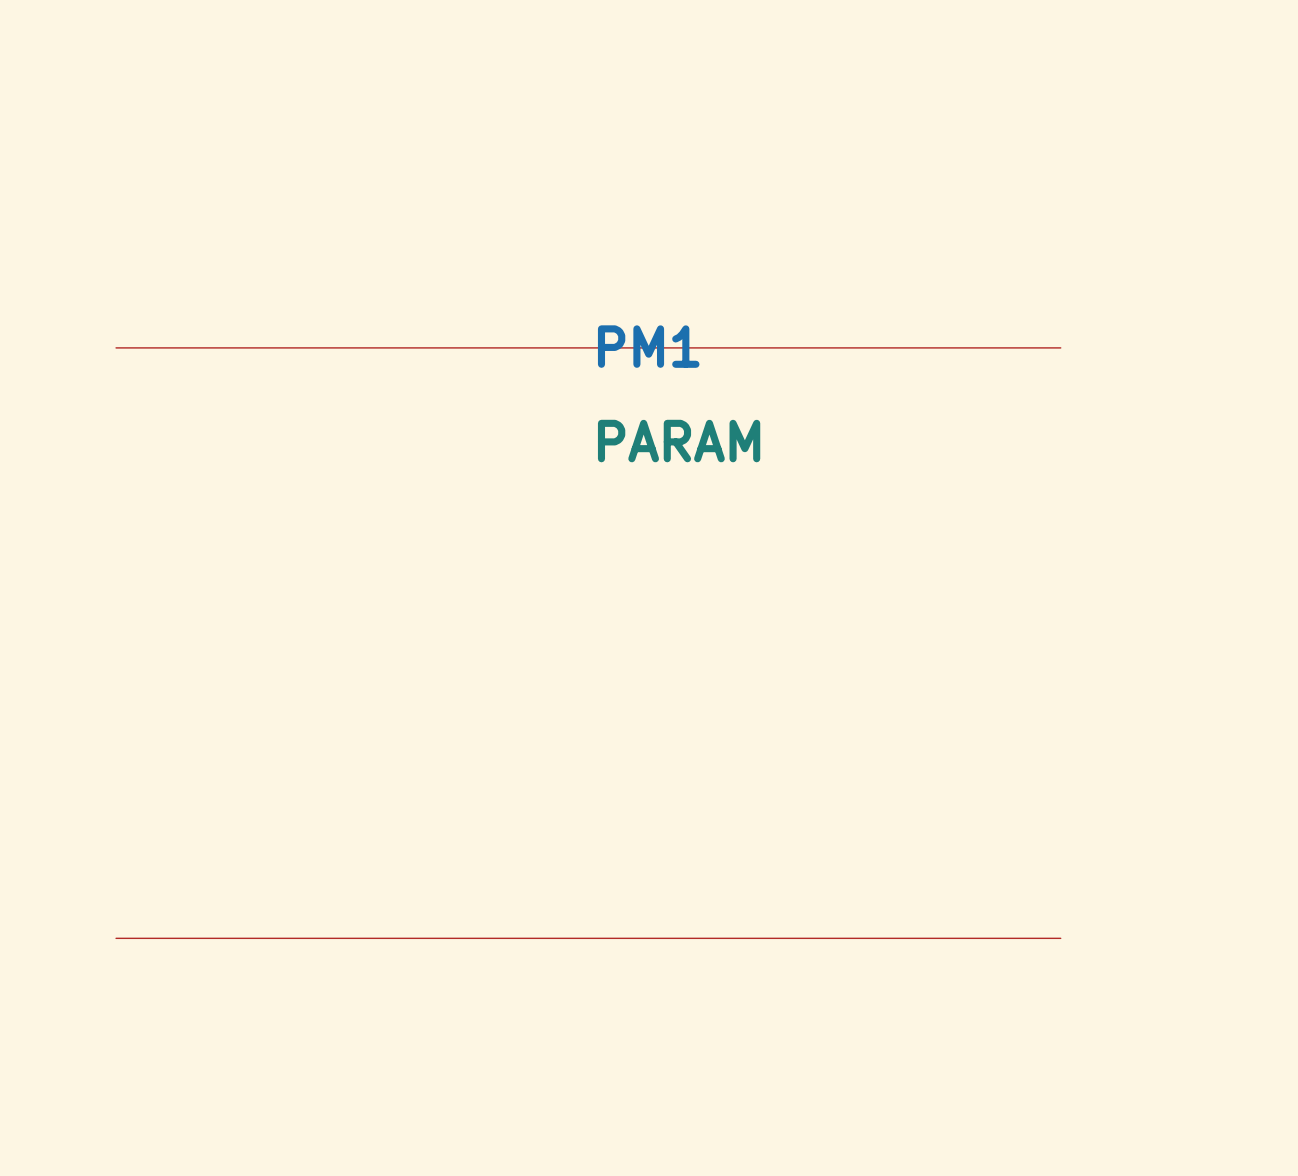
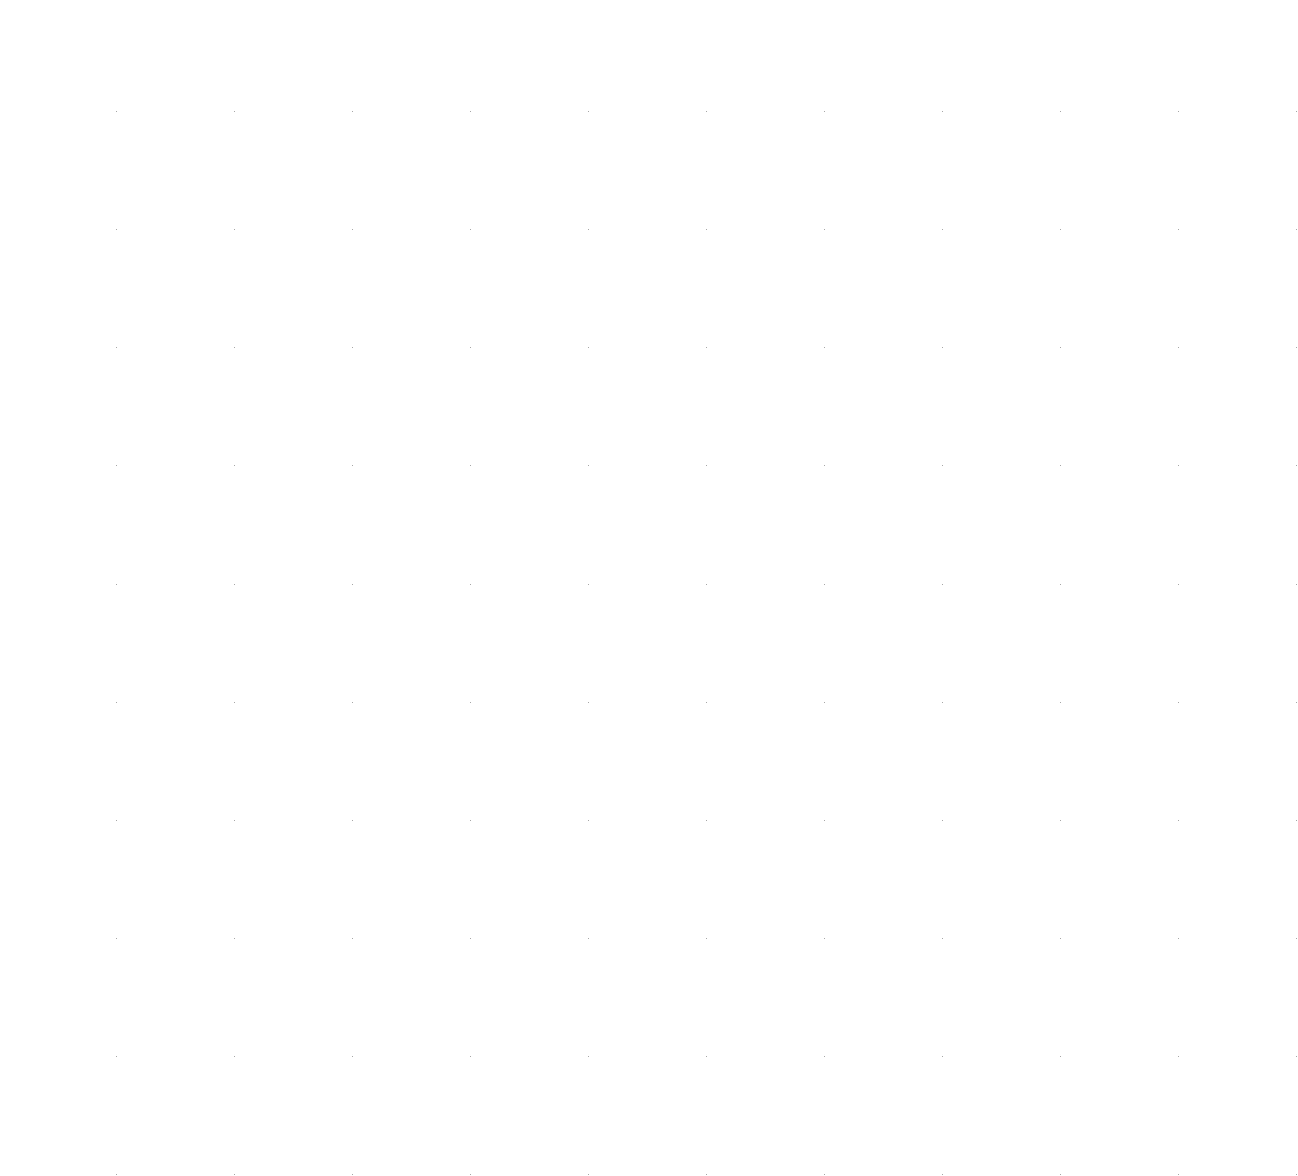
PM1: PARAM (588, 347) -> none
part: (588, 938) -> none

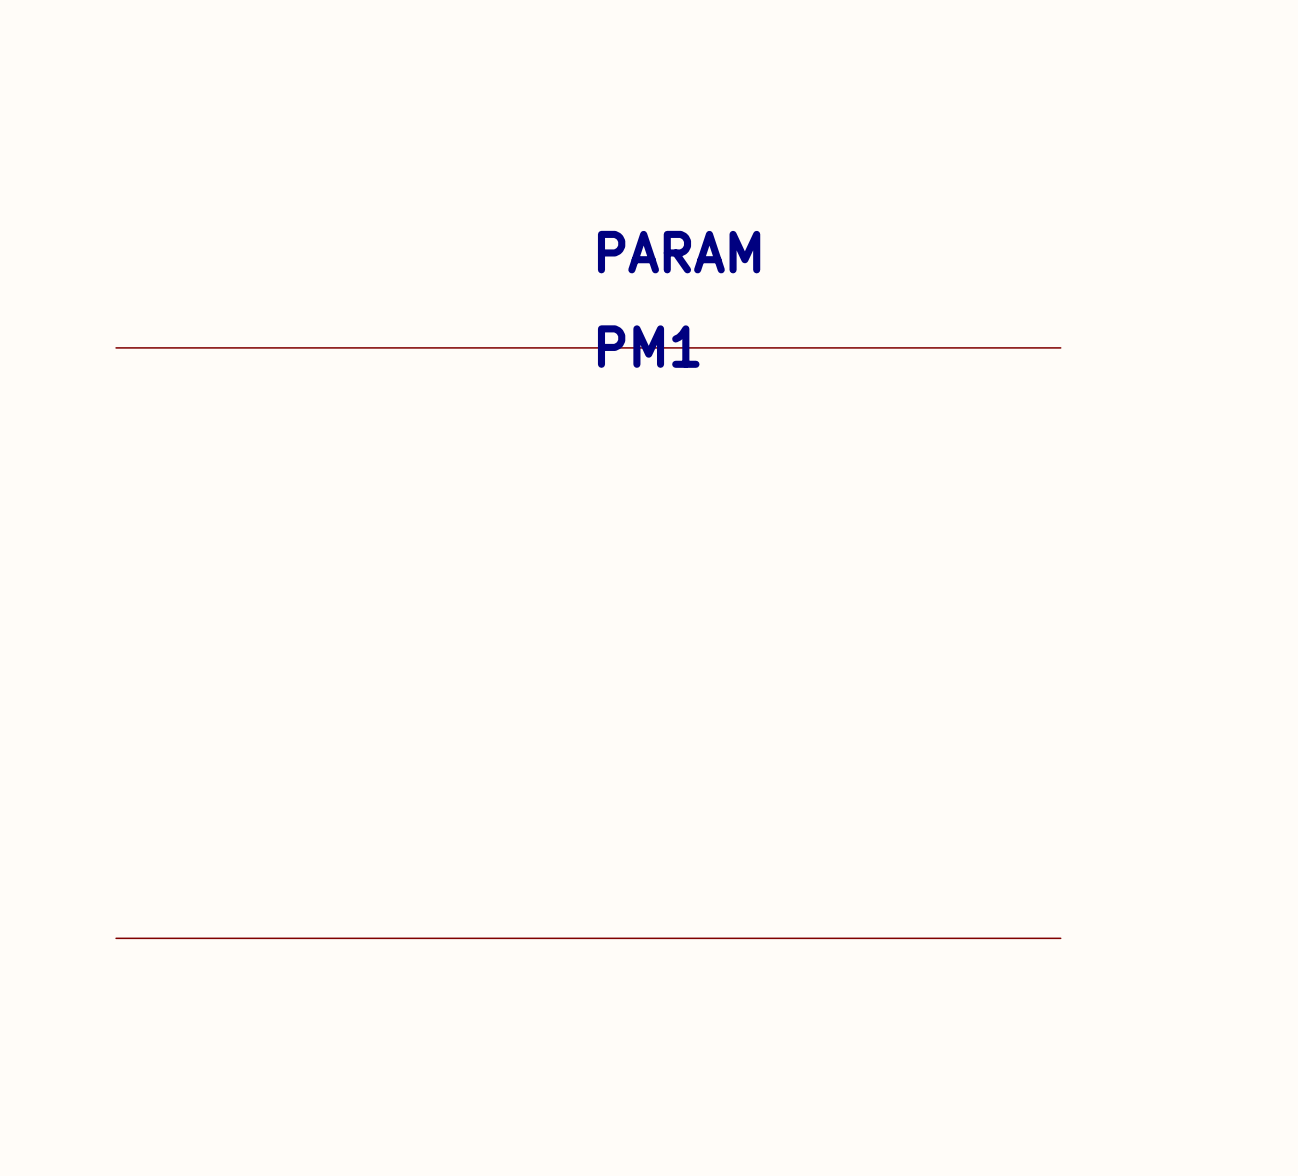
PM1: none -> PARAM (588, 347)
part: none -> (588, 938)

